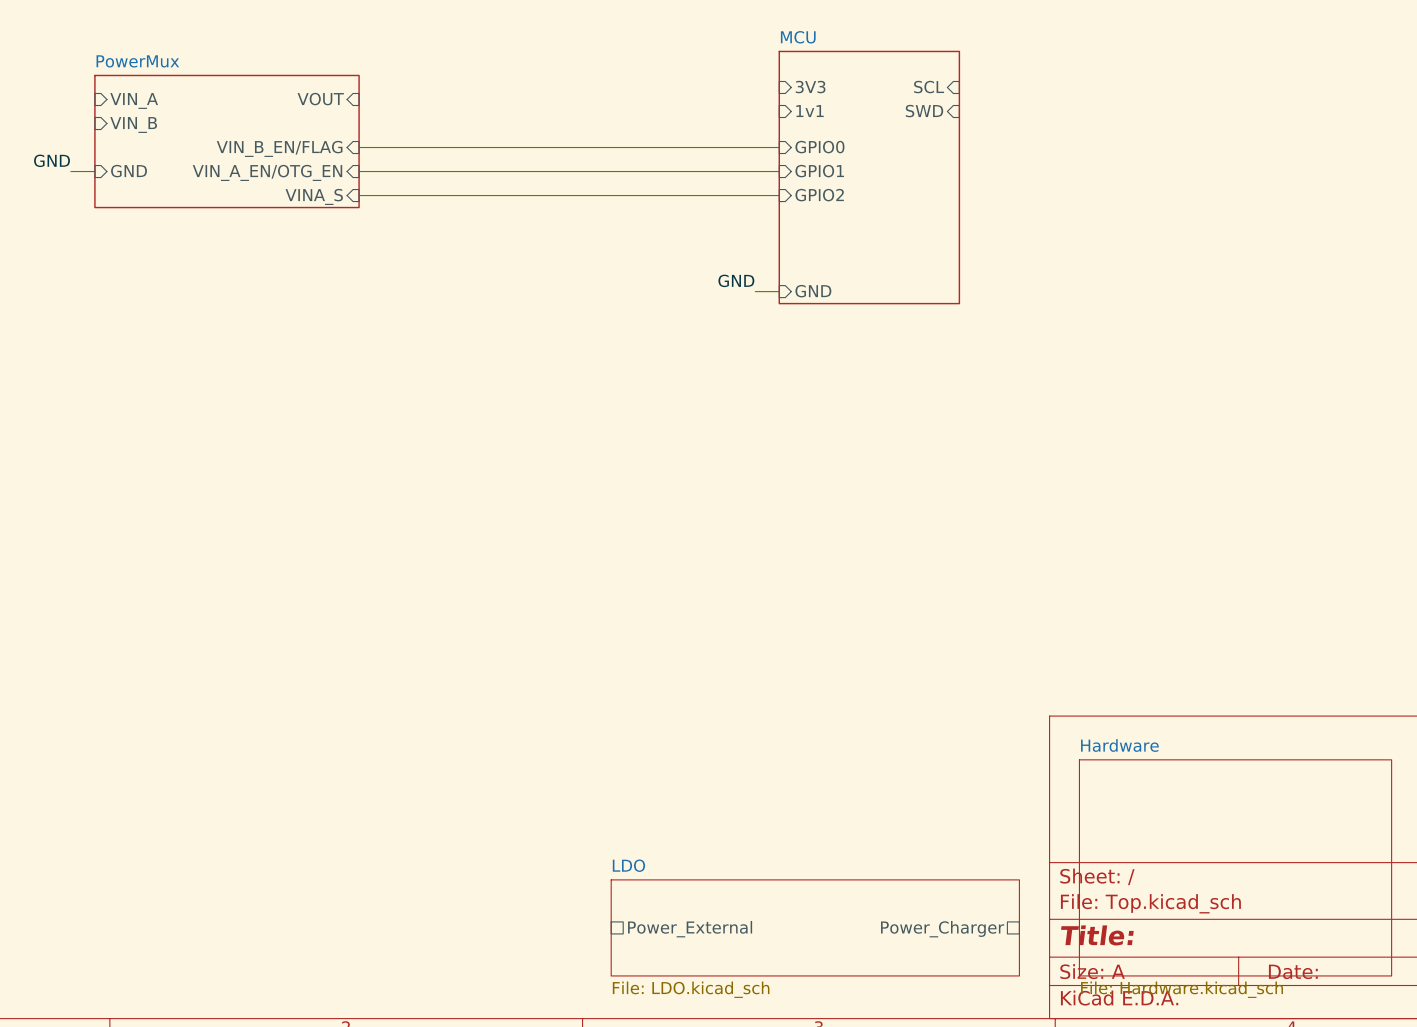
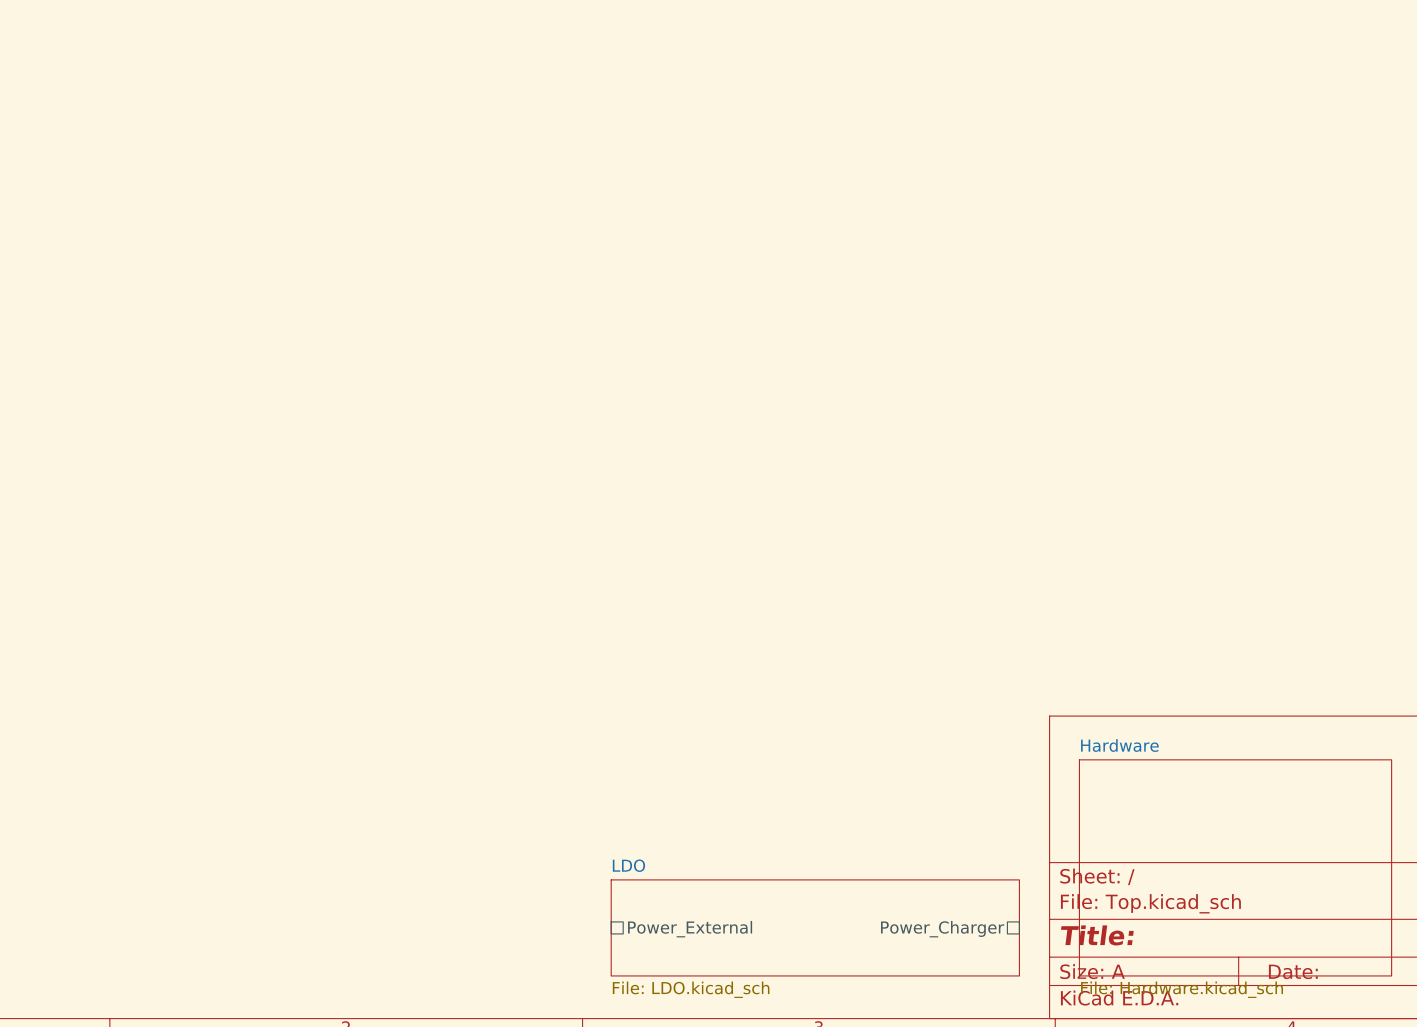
sheet pin: 3V3 (810, 87) -> none
sheet pin: SCL (929, 87) -> none
sheet pin: VOUT (320, 99) -> none
sheet pin: VIN_A (134, 100) -> none
sheet pin: 1v1 (810, 111) -> none
sheet pin: SWD (924, 111) -> none
sheet pin: VIN_B (133, 125) -> none
sheet PowerMux: (227, 141) -> none
wire: (359, 147) (779, 147) -> none
sheet pin: GPIO0 (819, 147) -> none
sheet pin: VIN_B_EN/FLAG (279, 148) -> none
label: GND (52, 160) -> none
wire: (70, 171) (94, 171) -> none
sheet pin: GND (129, 171) -> none
wire: (359, 171) (779, 171) -> none
sheet pin: GPIO1 (819, 171) -> none
sheet pin: VIN_A_EN/OTG_EN (267, 172) -> none
sheet MCU: (869, 177) -> none
wire: (359, 195) (779, 195) -> none
sheet pin: GPIO2 (819, 195) -> none
sheet pin: VINA_S (314, 196) -> none
label: GND (736, 280) -> none
wire: (755, 291) (779, 291) -> none
sheet pin: GND (813, 291) -> none

